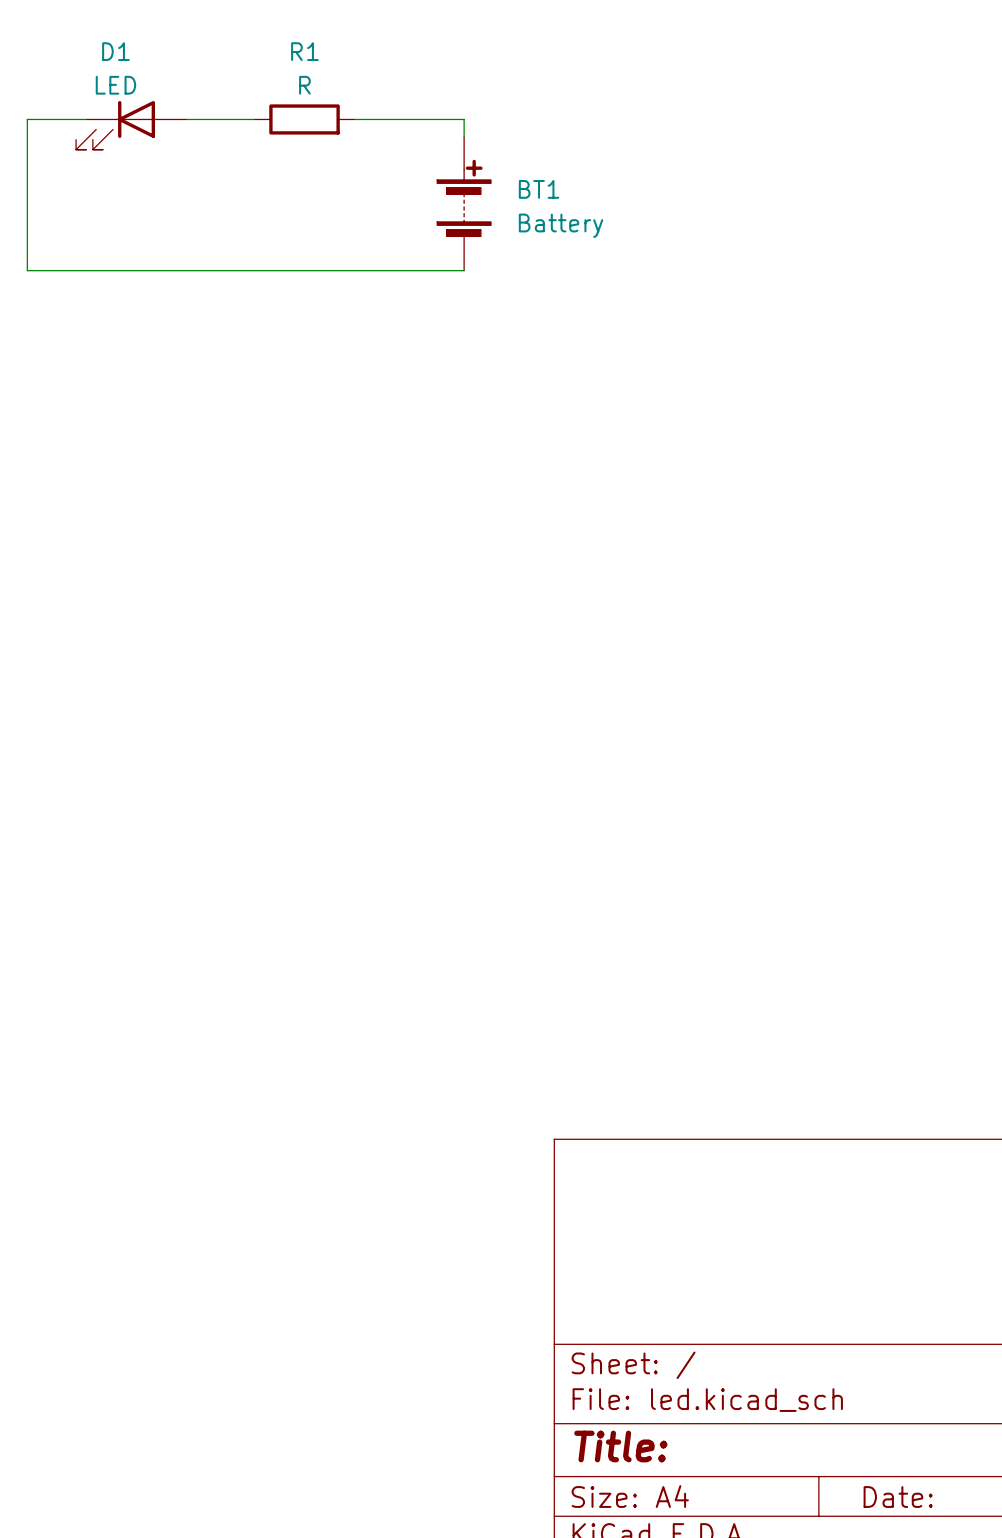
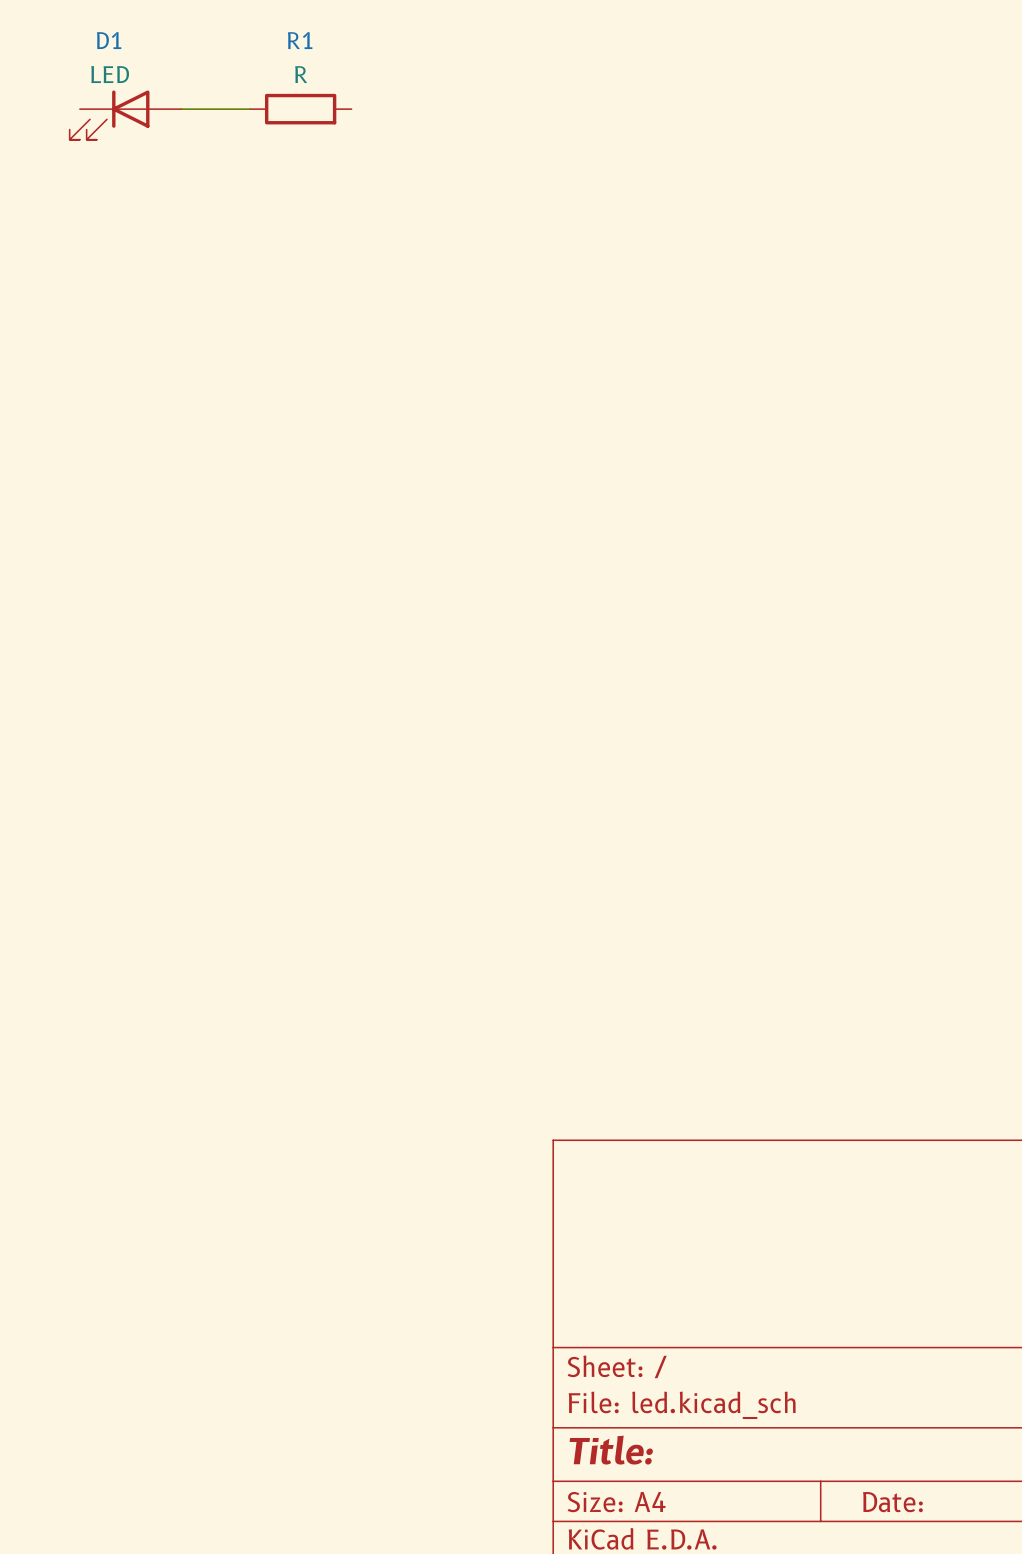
wire: (86, 119) (27, 119) (27, 270) (464, 270) -> none
wire: (354, 119) (464, 119) (464, 136) -> none
BT1: Battery (464, 203) -> none

